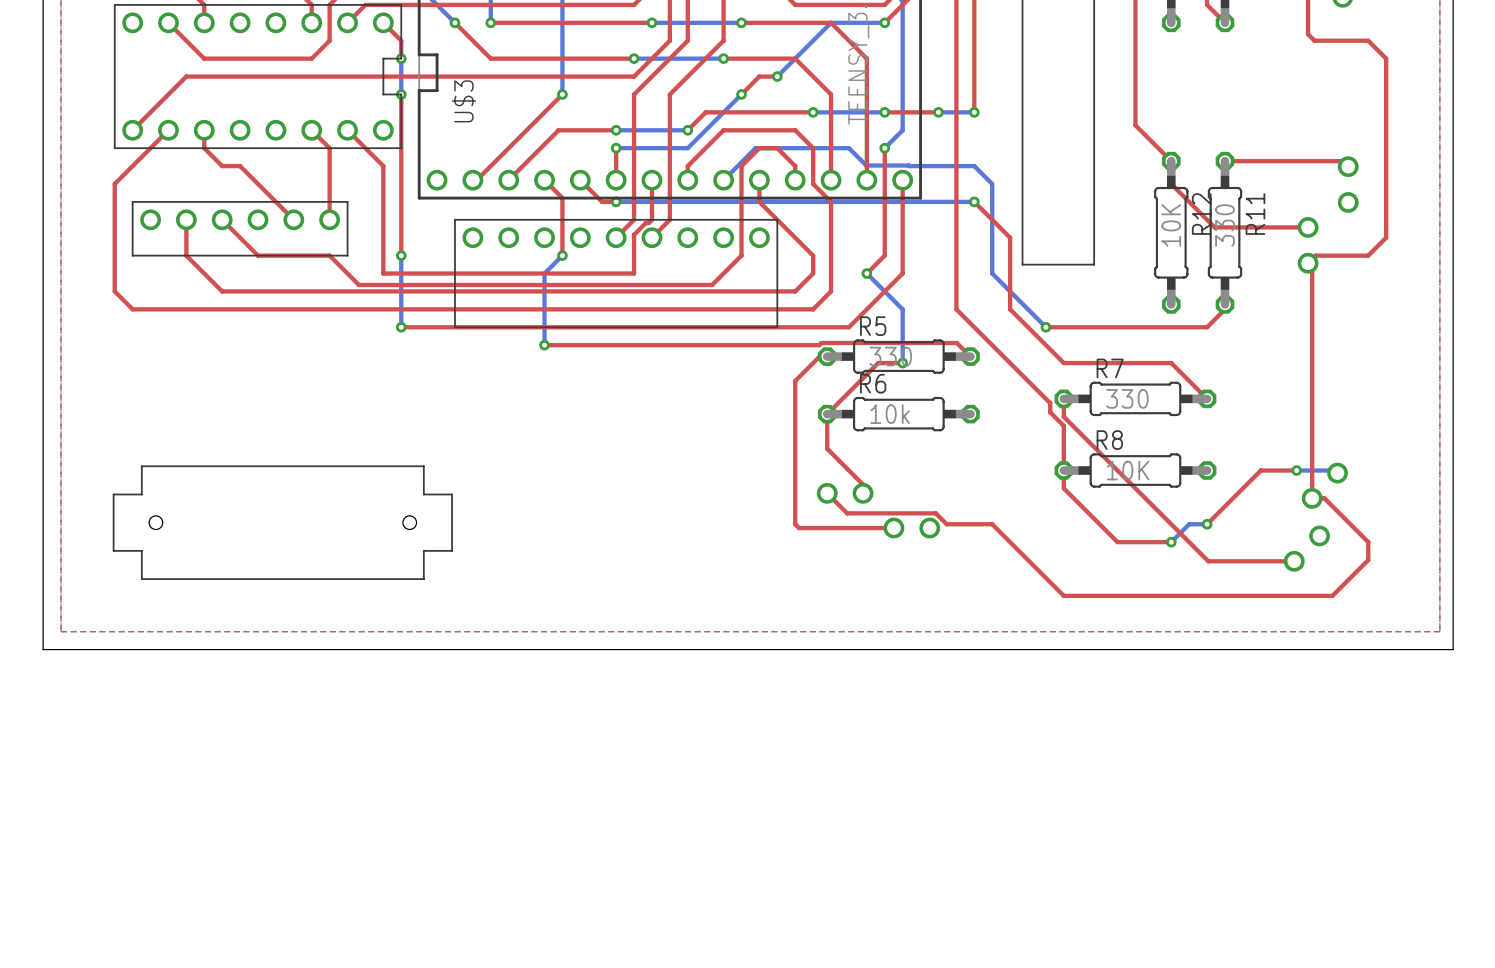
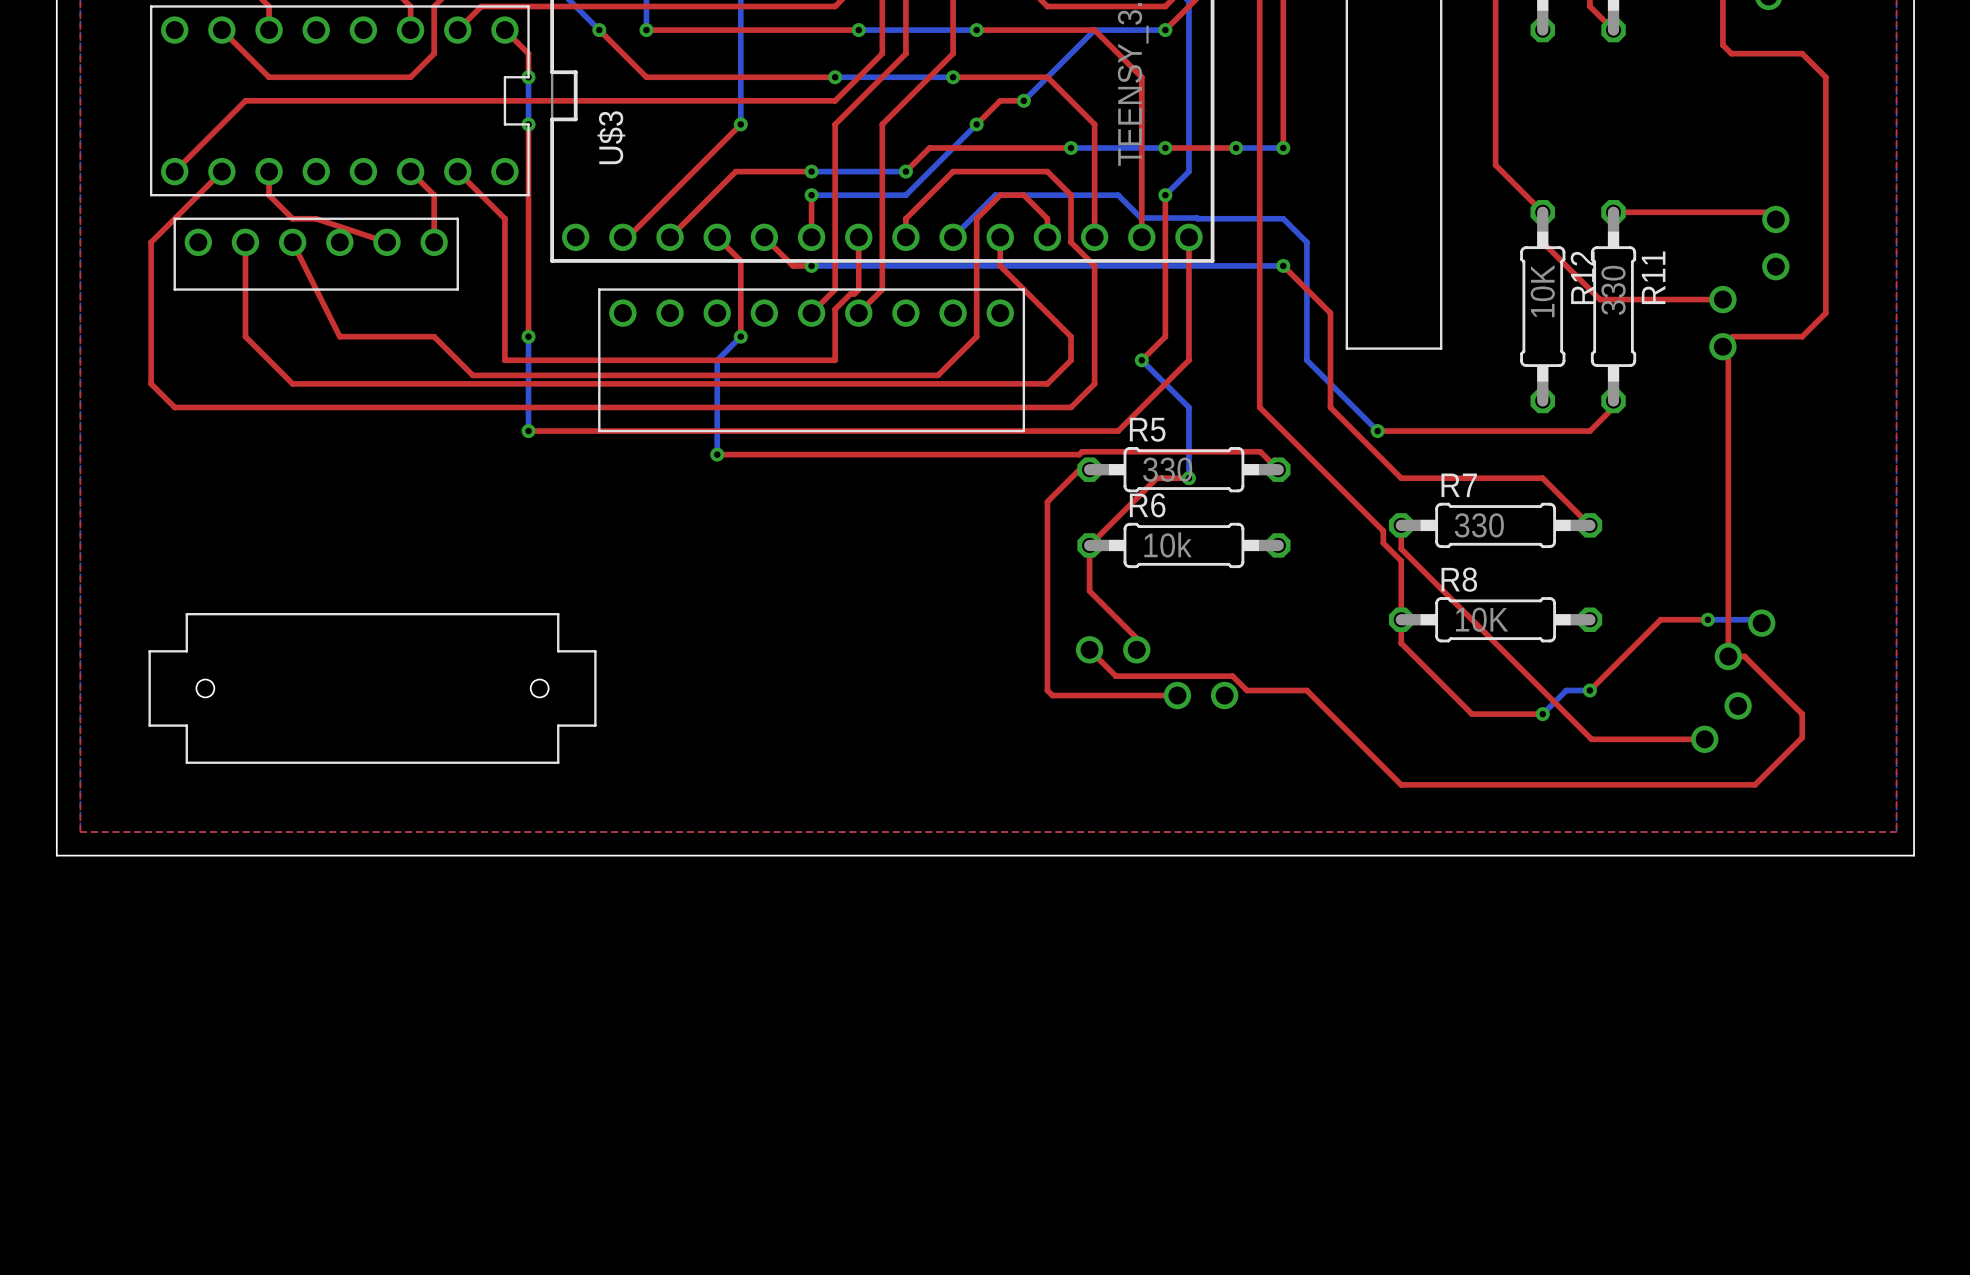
top track: (240, 166) (293, 219) -> (316, 218) (387, 242)
top track: (329, 183) (329, 219) -> (245, 242) (245, 289)
top track: (222, 219) (258, 255) -> (292, 242) (339, 336)
part position: (240, 228) -> (316, 254)

